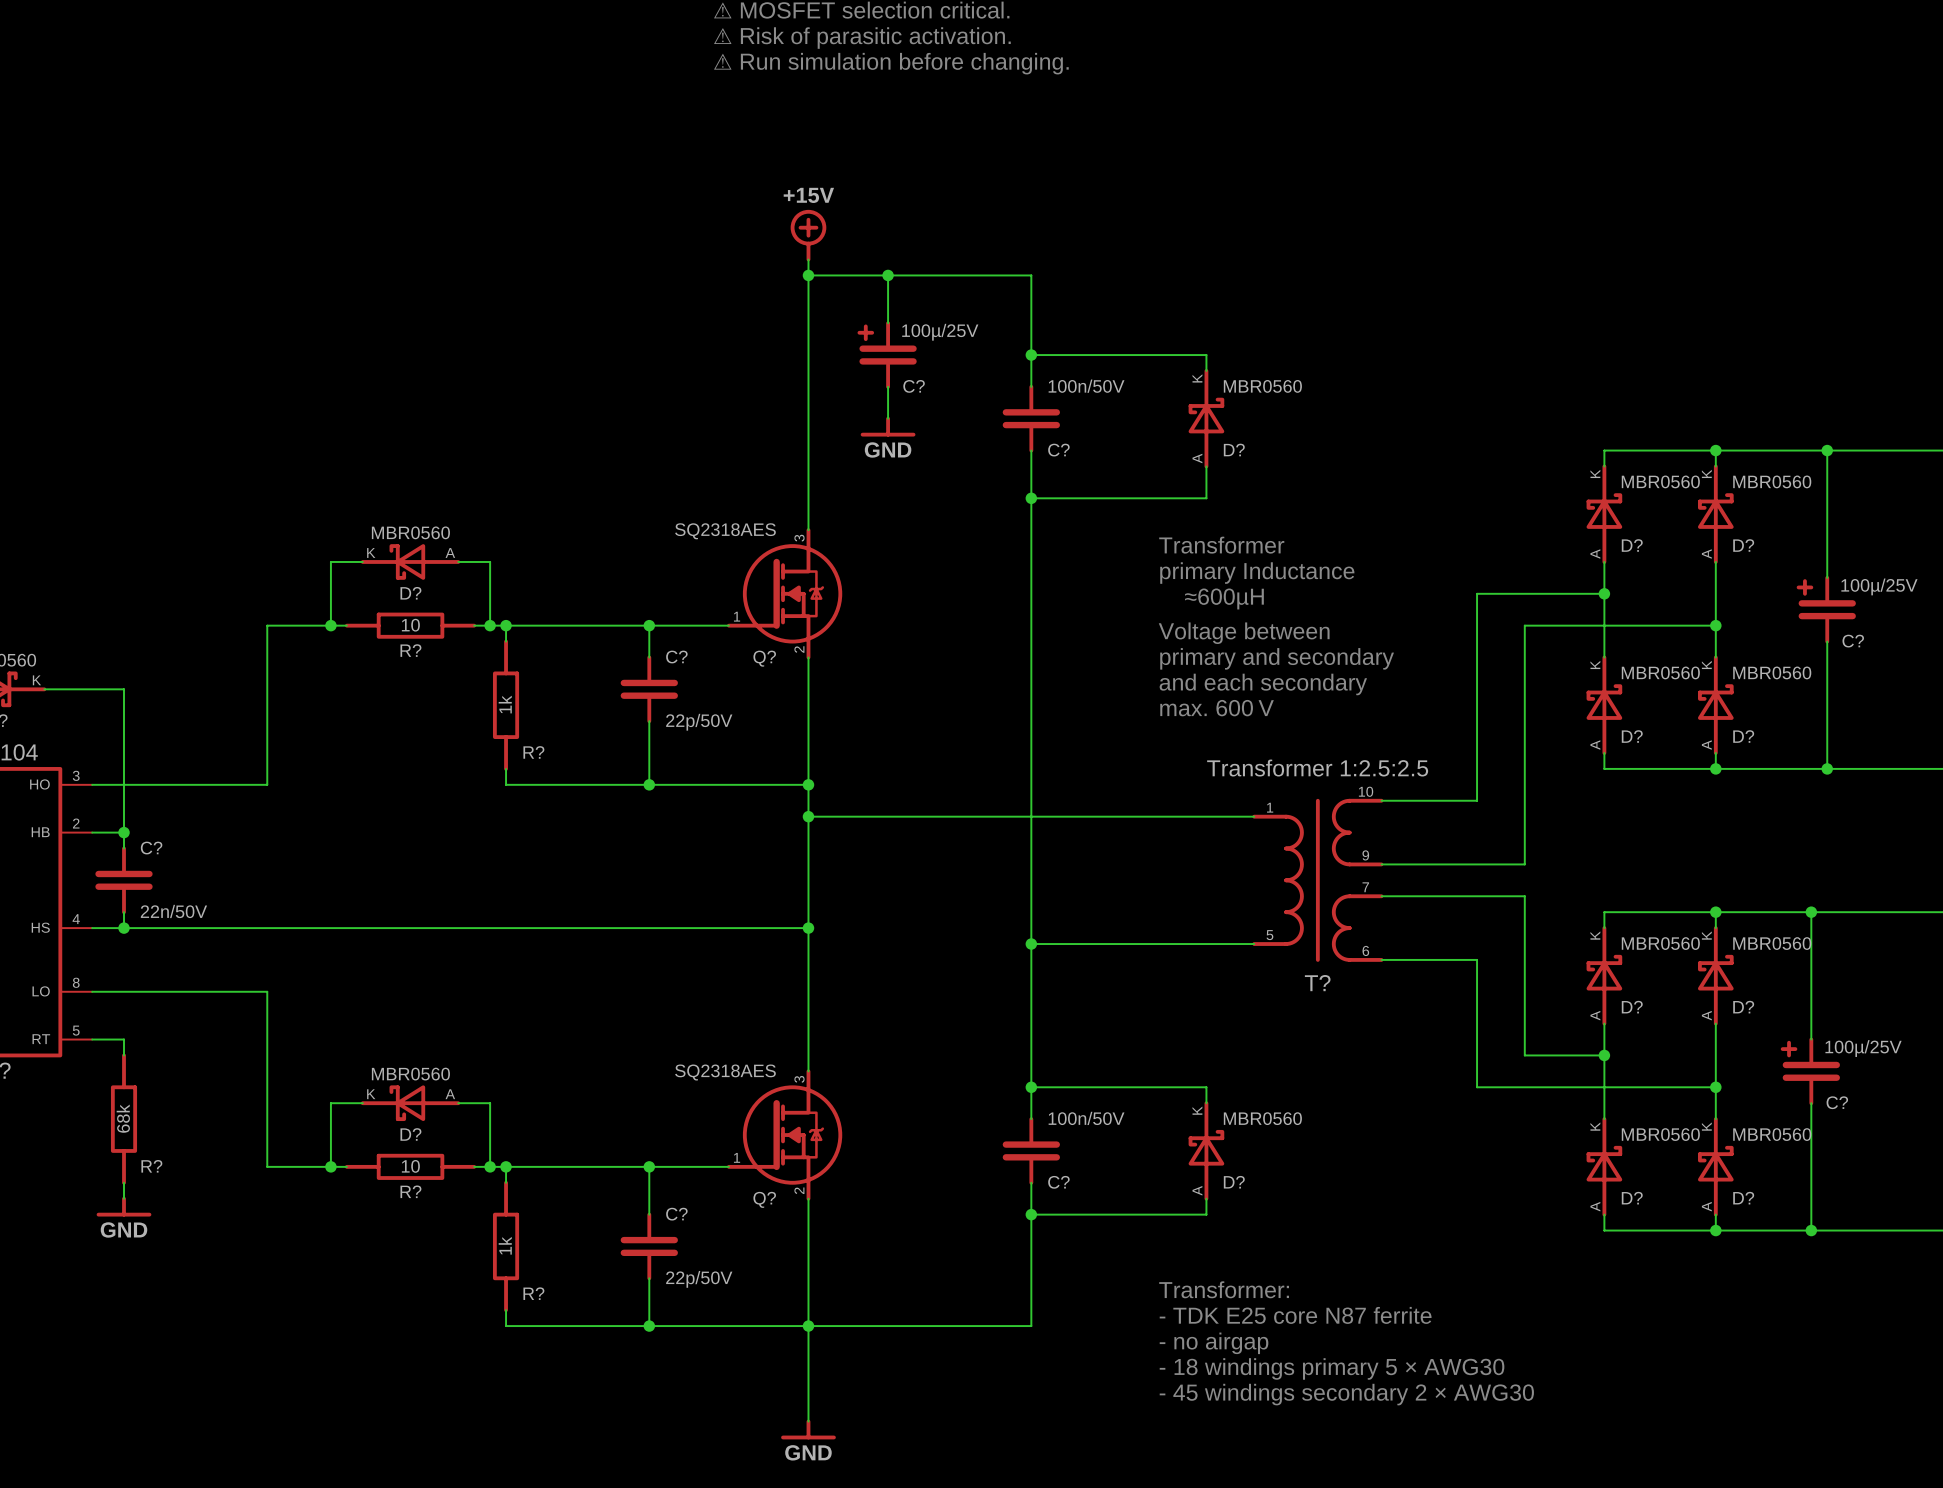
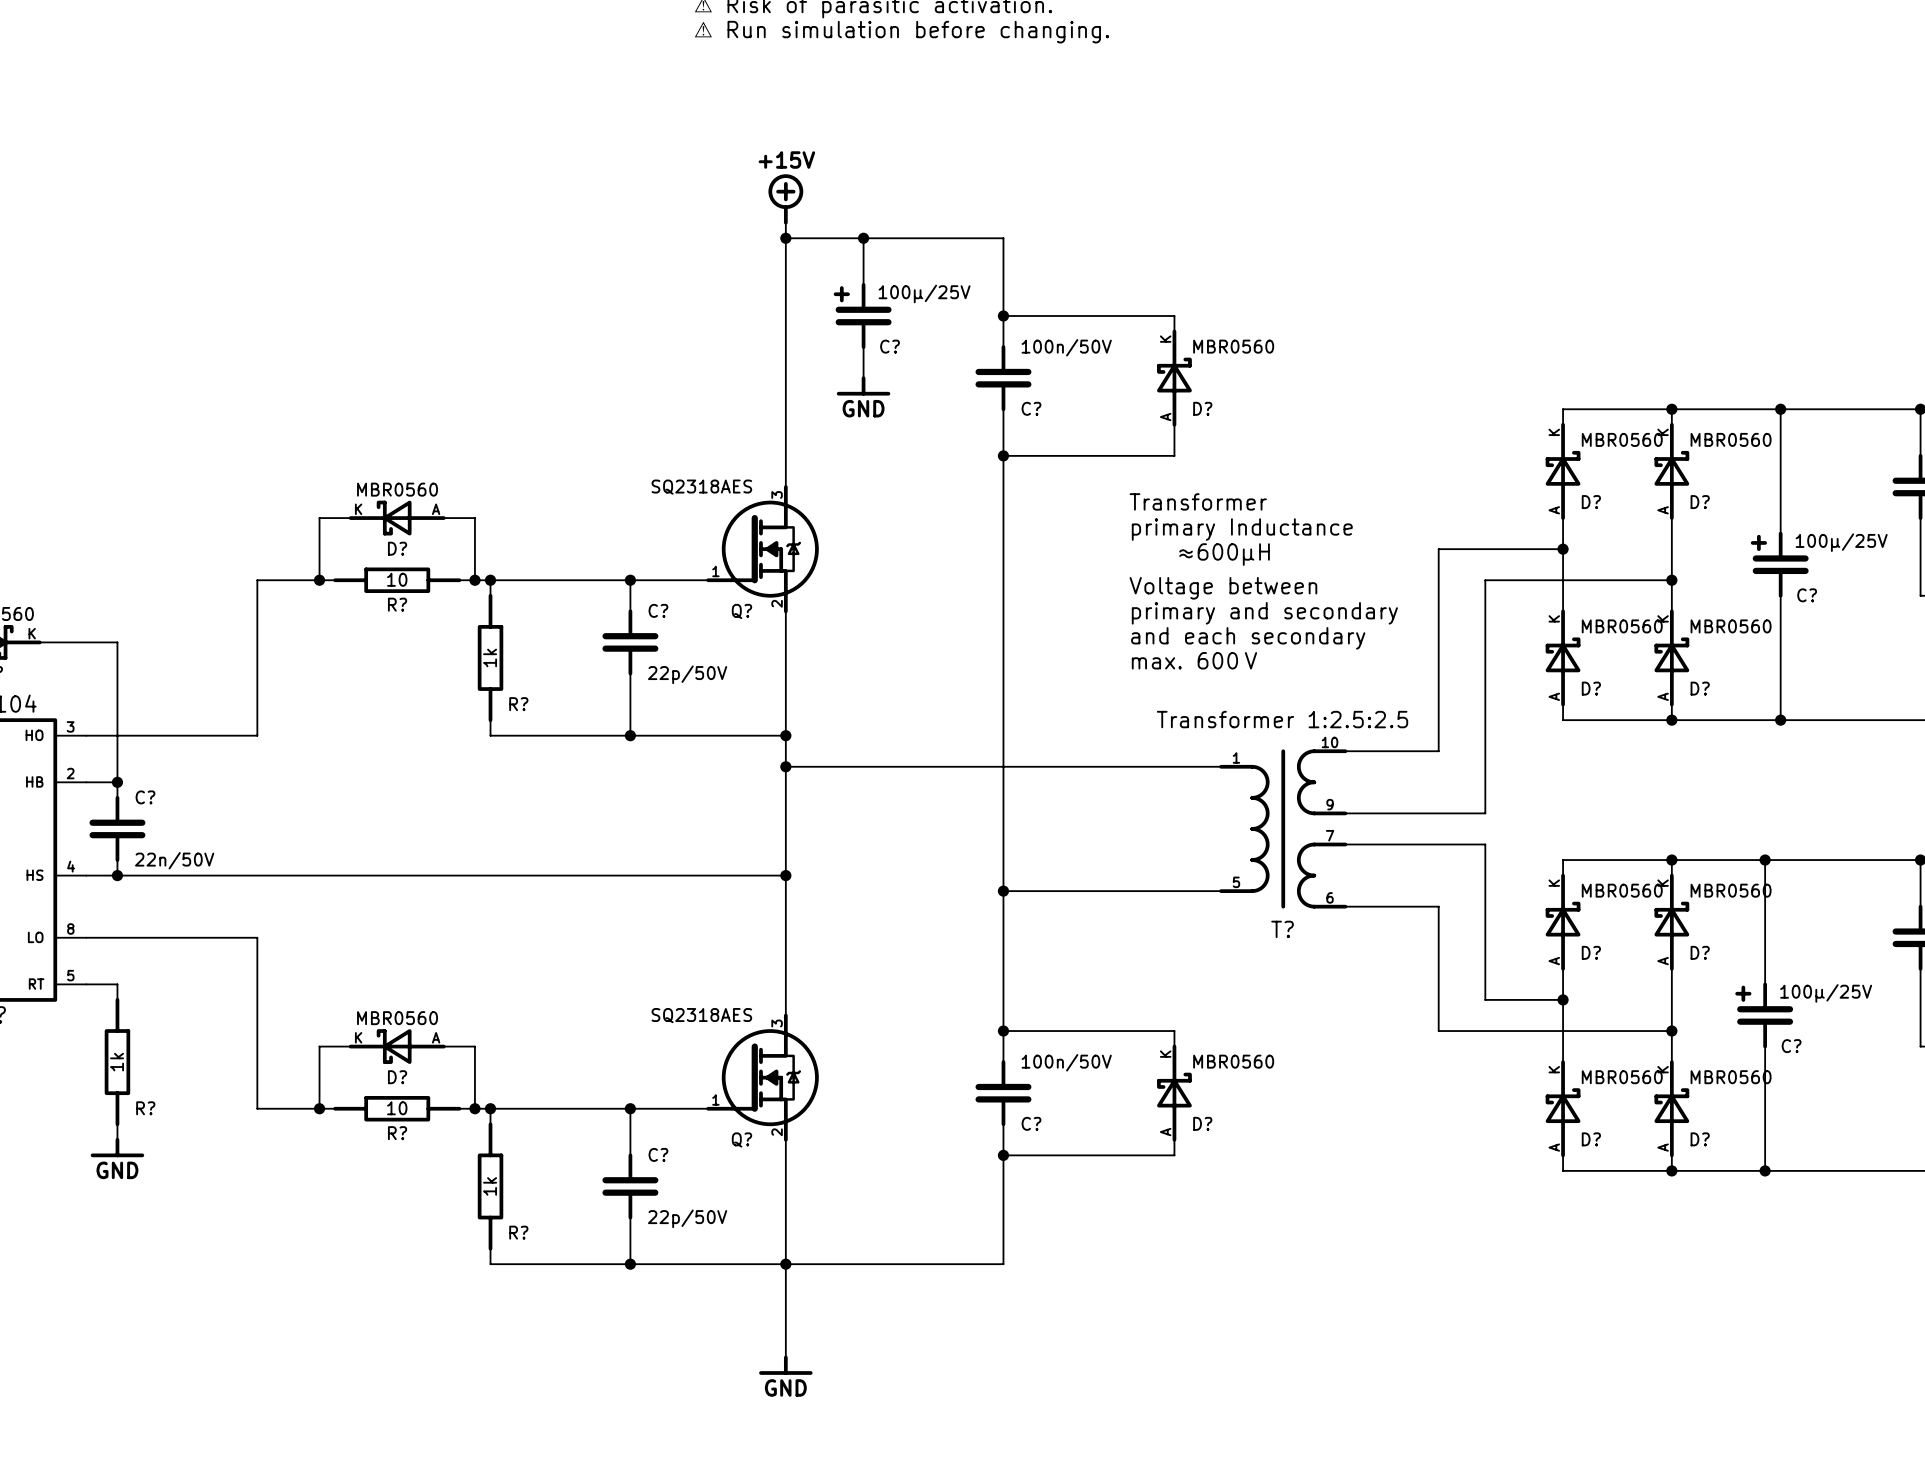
R? value: 68k (123, 1118) -> 1k (117, 1062)
text: Transformer: (1224, 1289) -> none
text: - TDK E25 core N87 ferrite (1295, 1315) -> none
text: - no airgap (1214, 1343) -> none
text: - 18 windings primary 5 × AWG30 (1332, 1368) -> none
text: - 45 windings secondary 2 × AWG30 (1346, 1394) -> none

